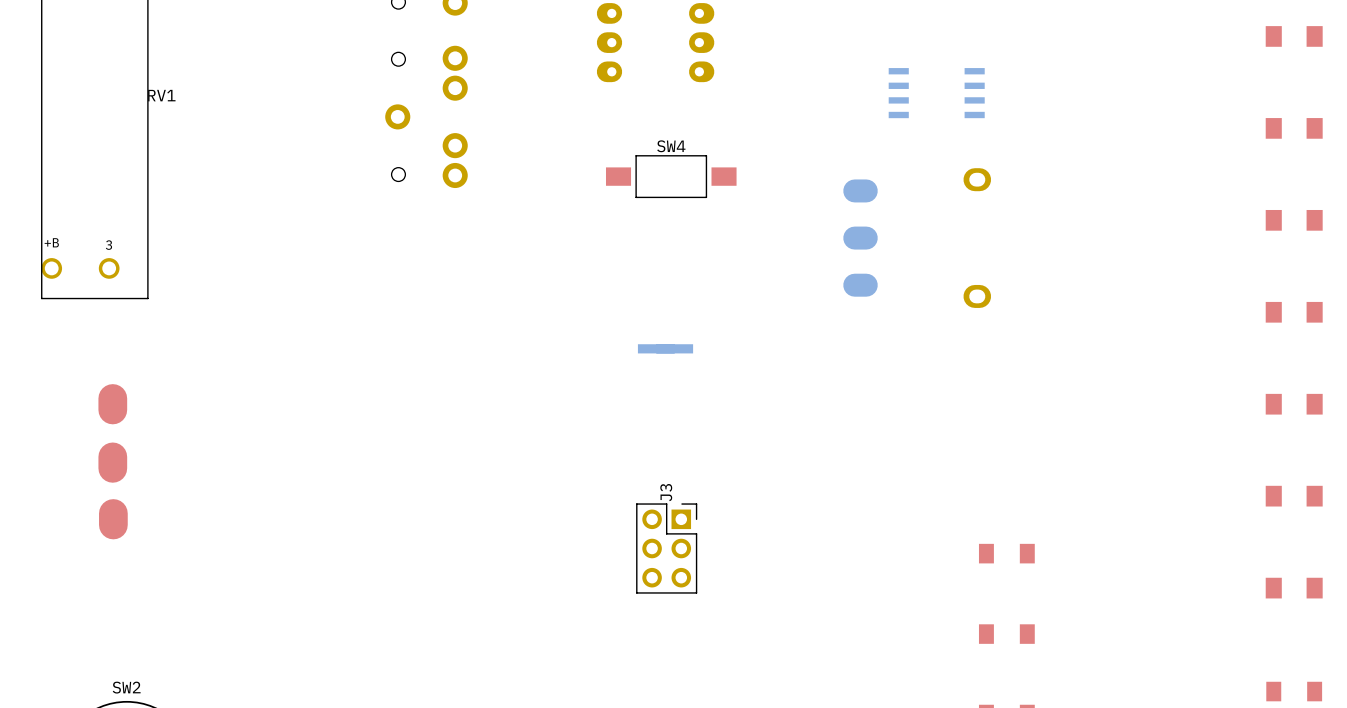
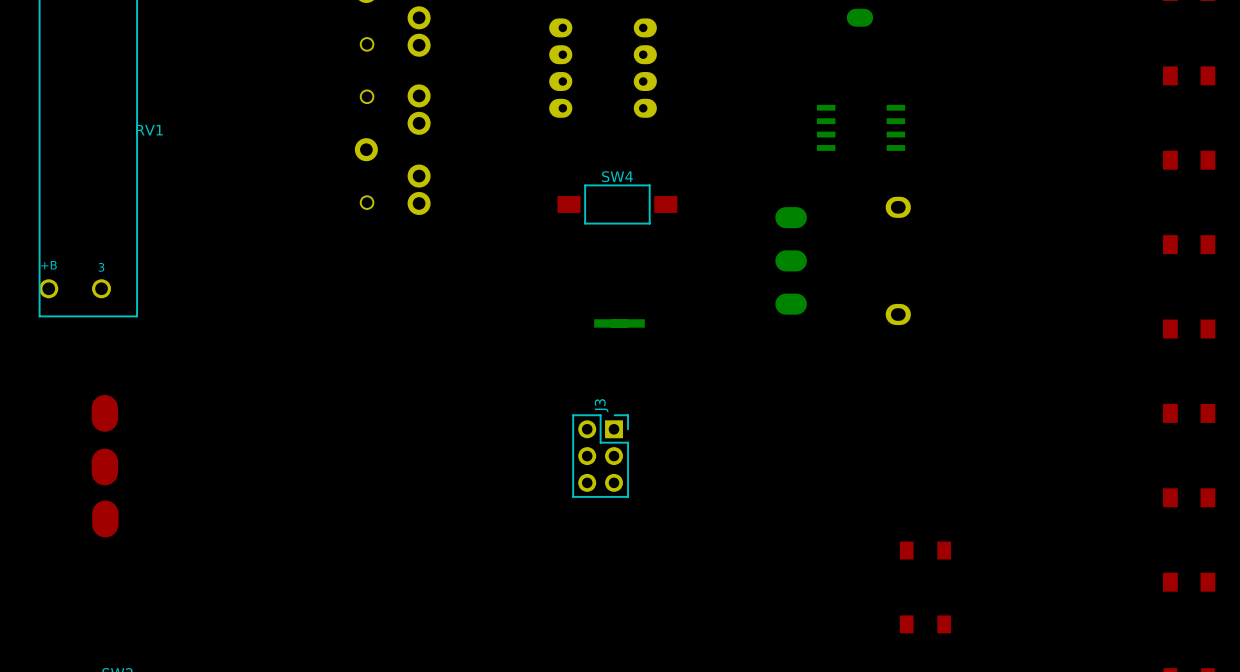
part position: (665, 348) -> (619, 323)
J3 position: (666, 548) -> (600, 456)

